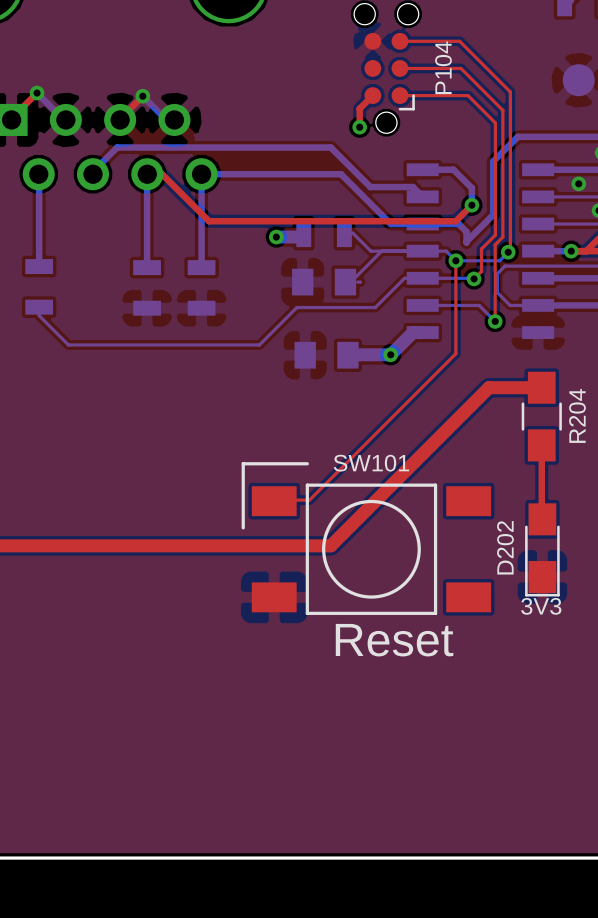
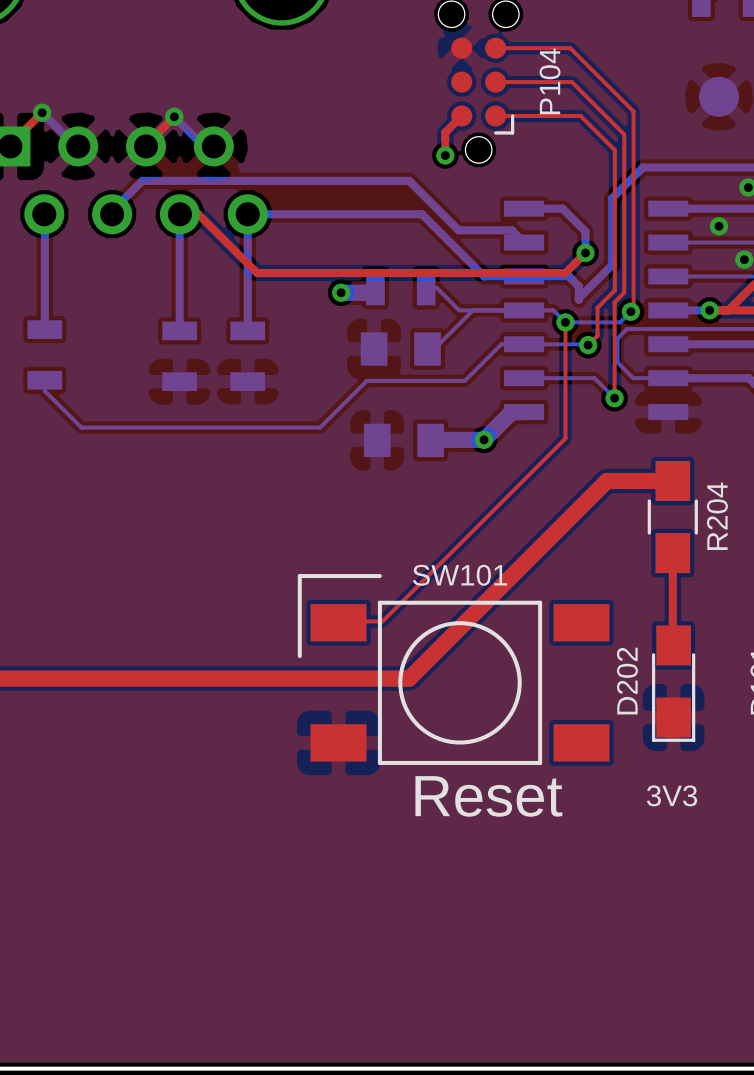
bottom track: (357, 282) (360, 282) -> none
text position: 3V3 (541, 606) -> 3V3 (672, 795)

